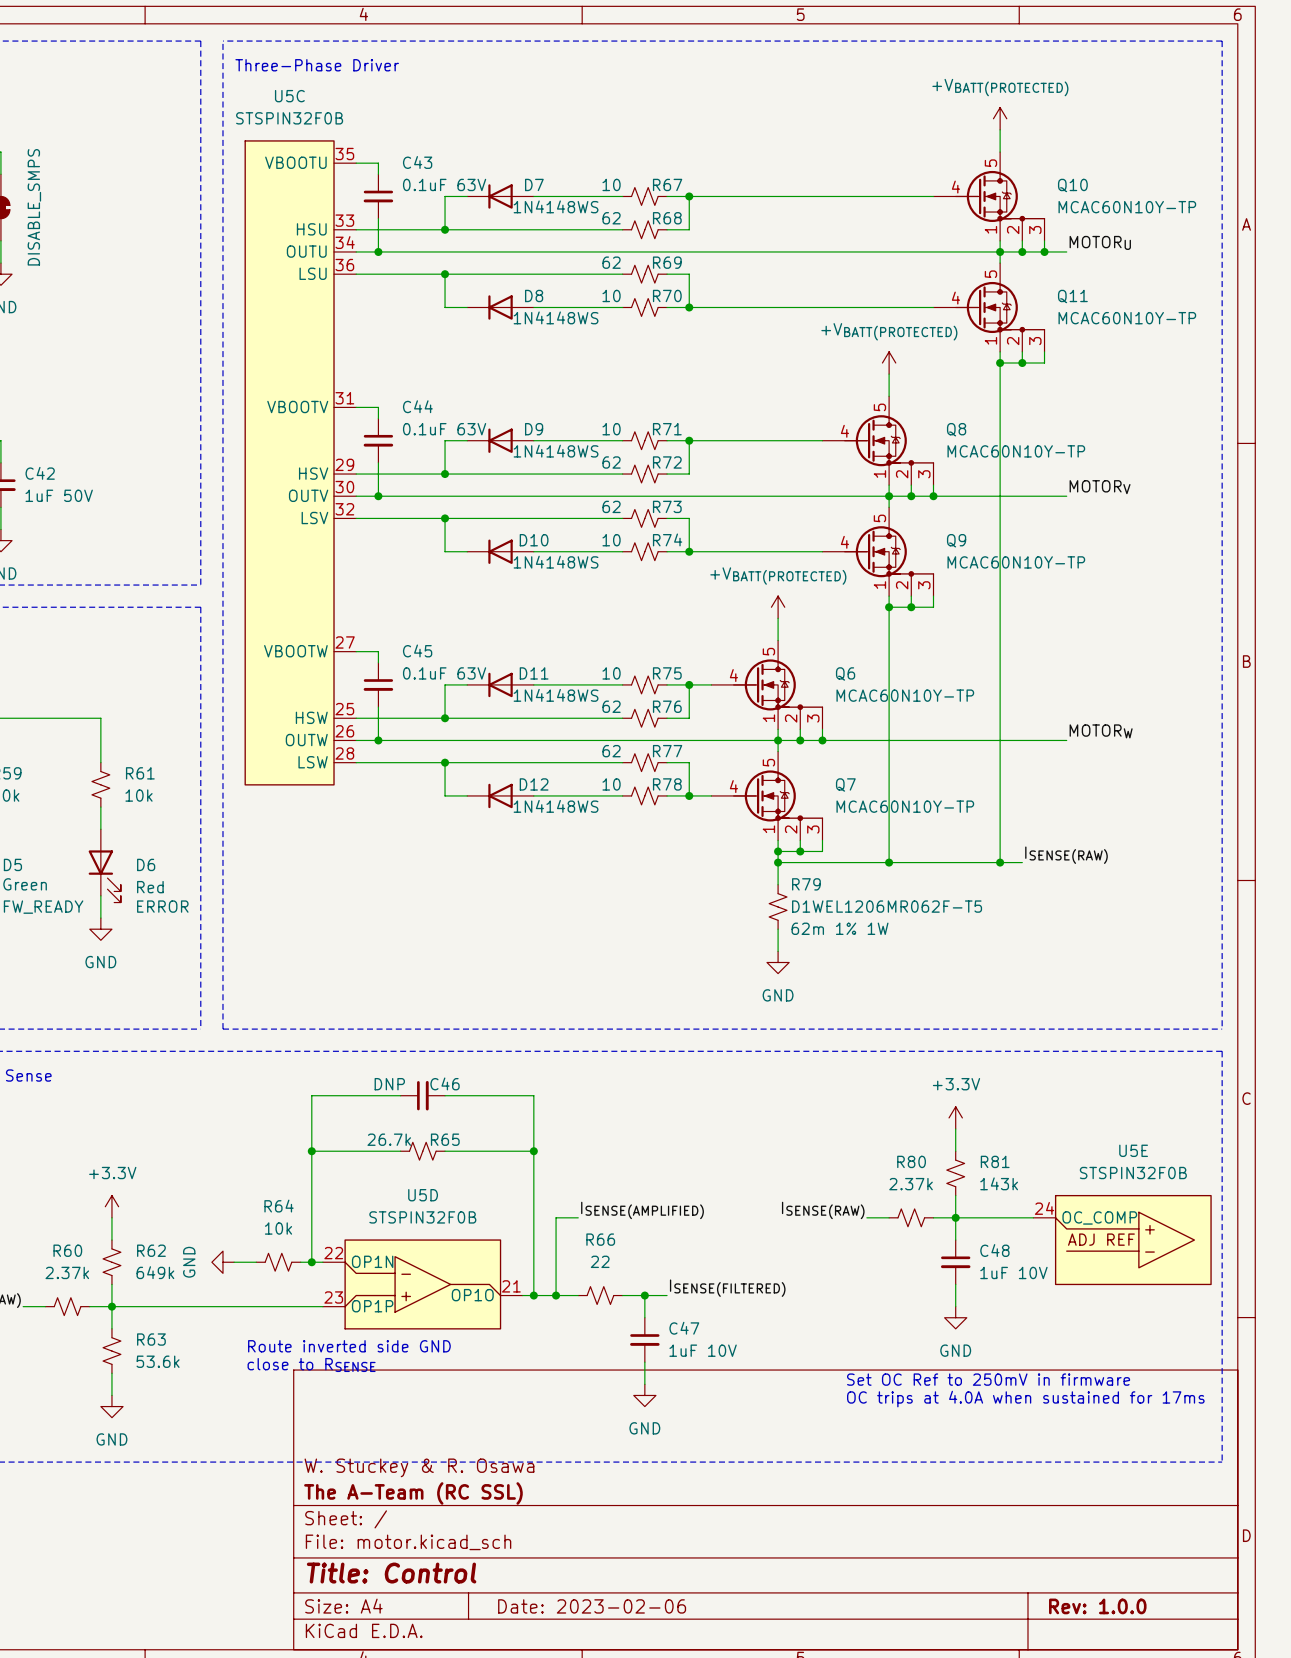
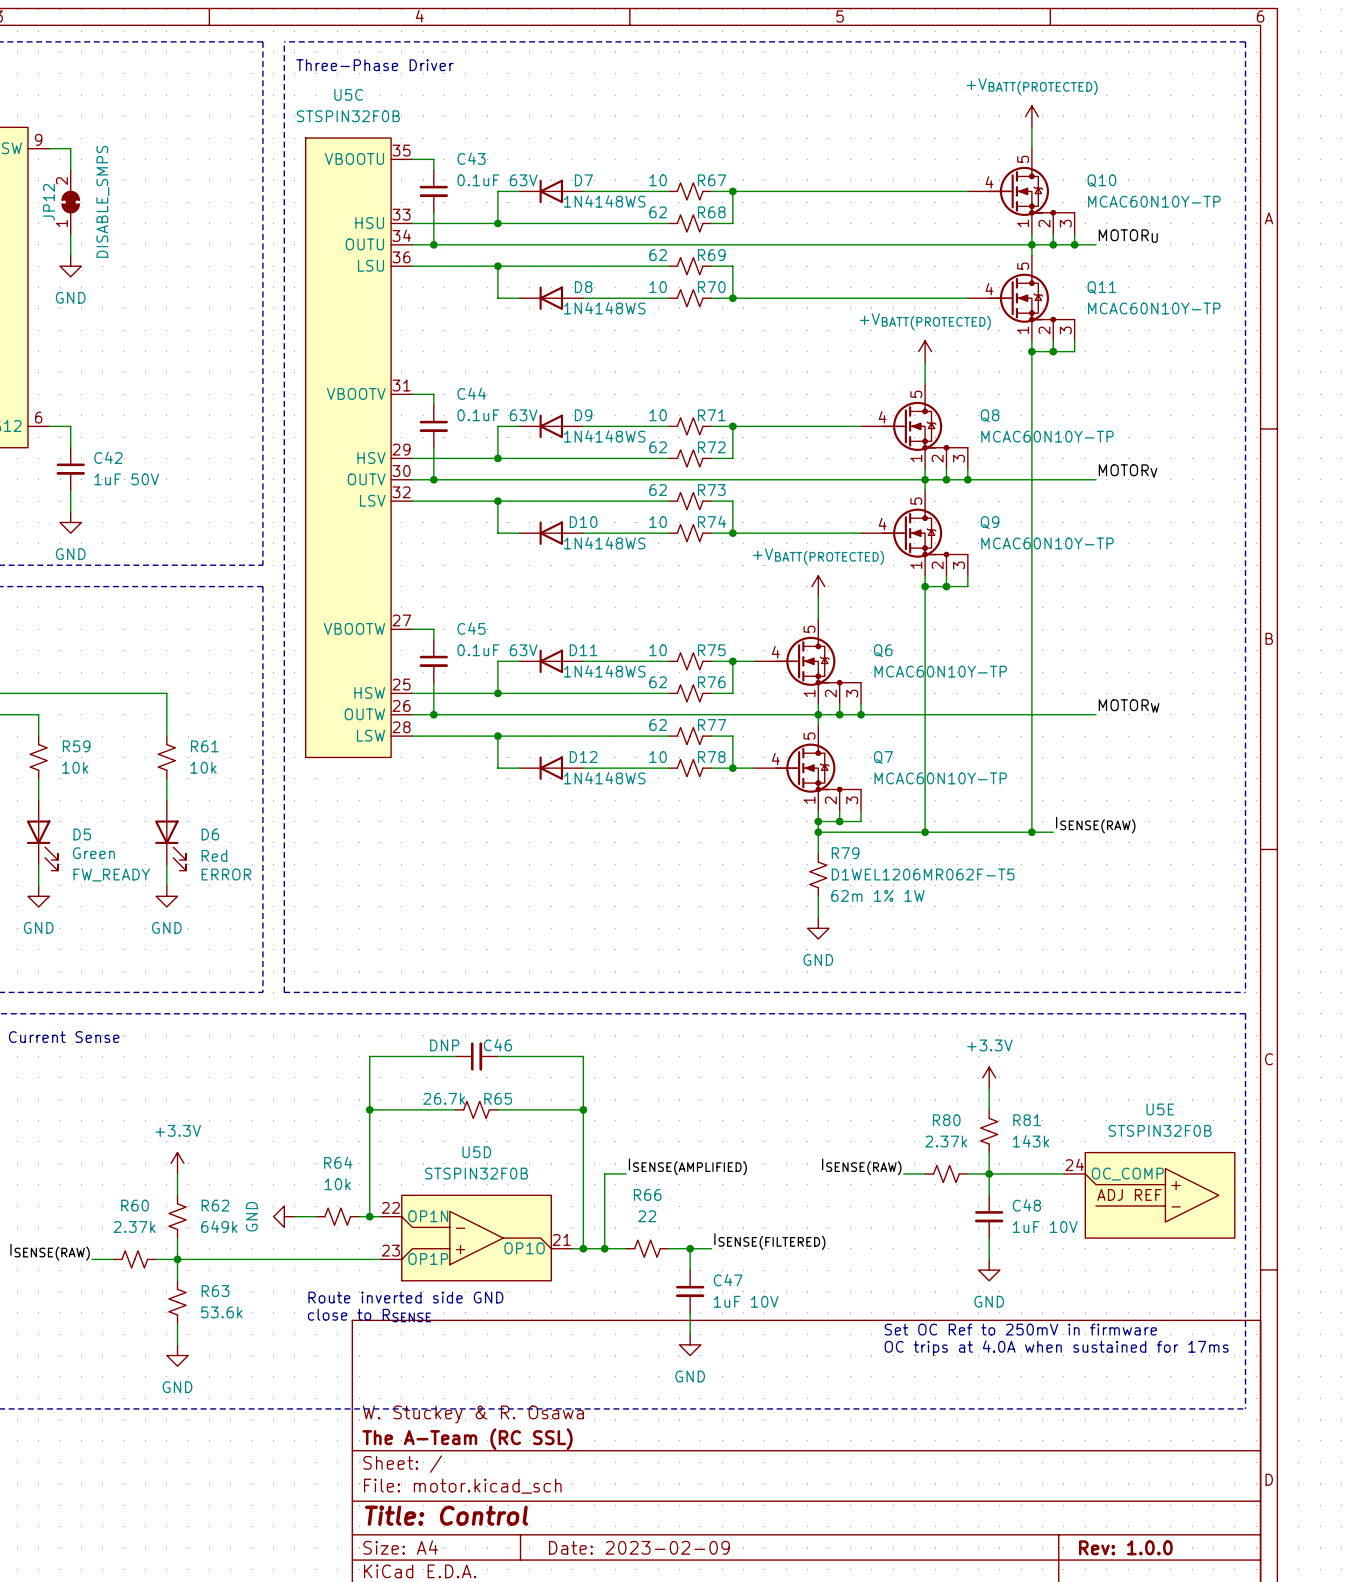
title block: Date: 2023-02-06 (592, 1606) -> Date: 2023-02-09 (639, 1547)

